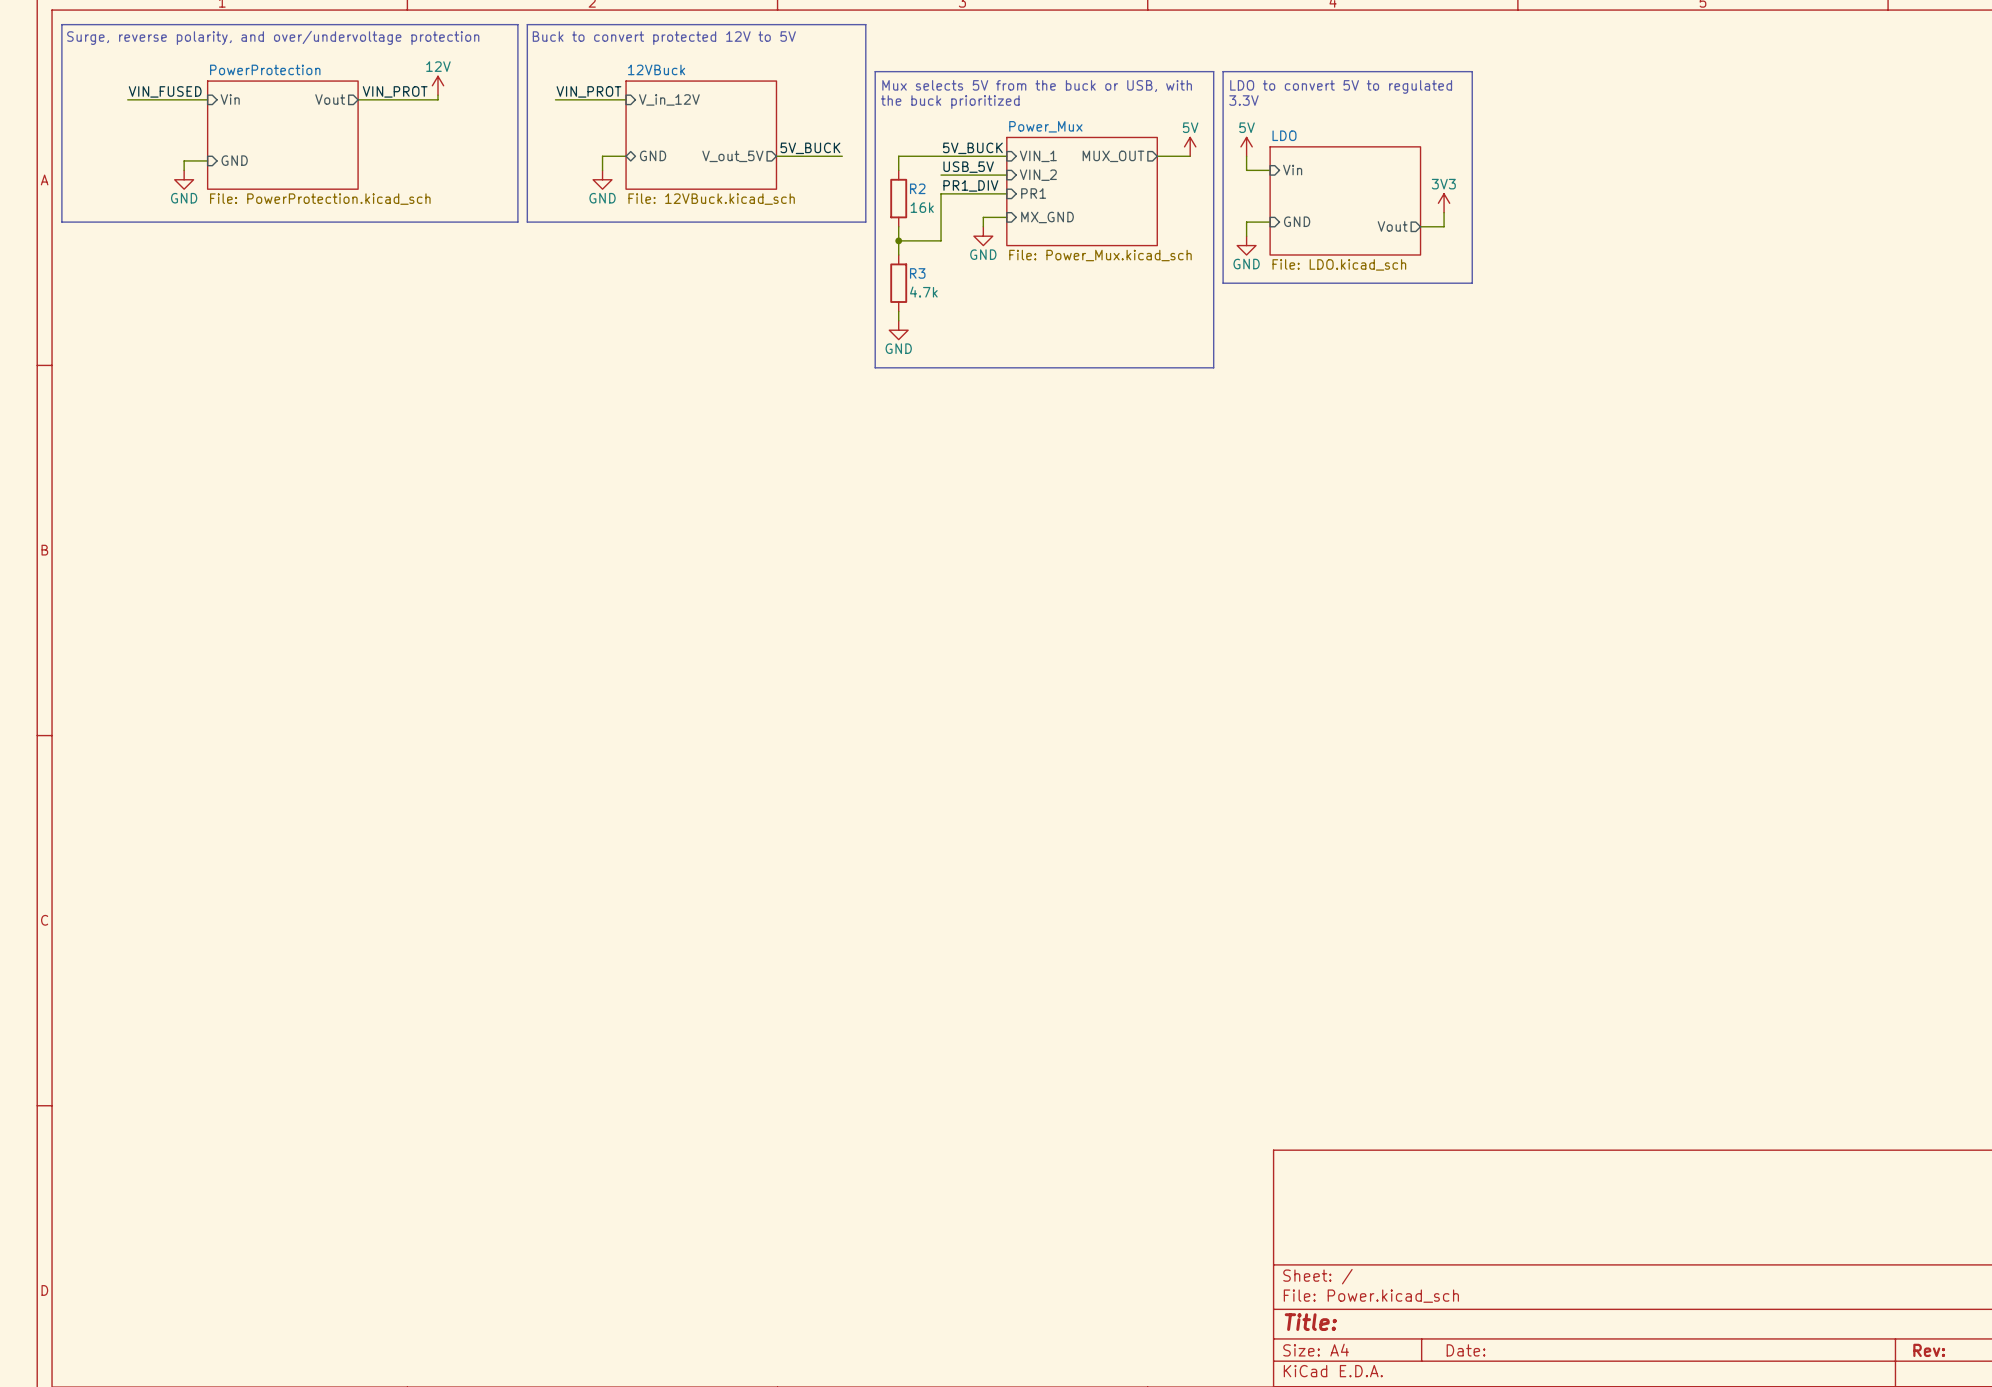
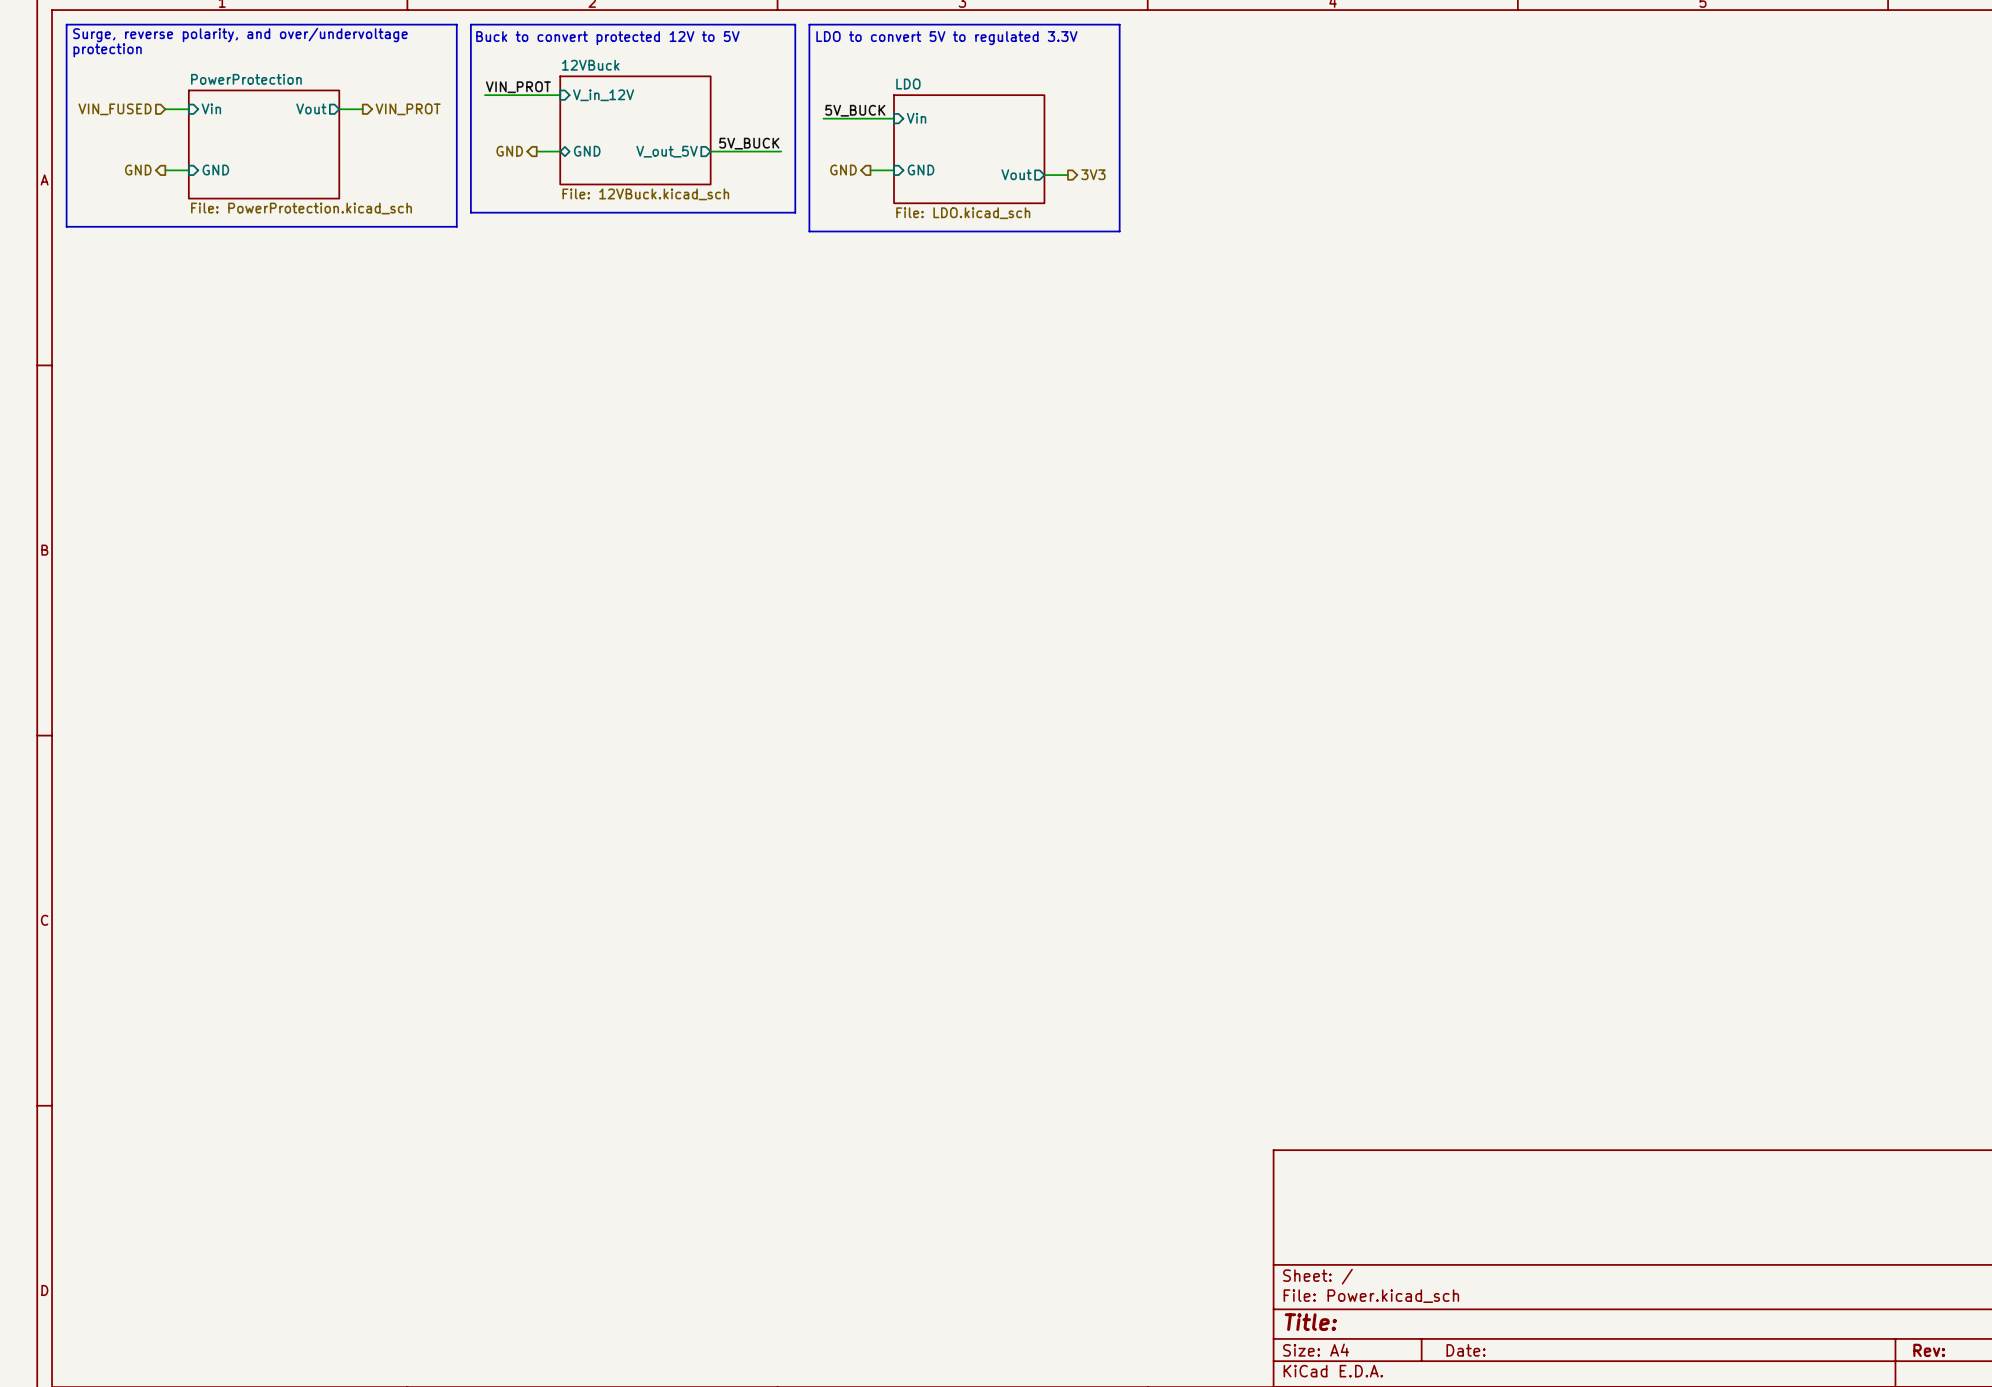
line: (66, 24) (61, 24) (61, 222) (517, 222) (517, 24) -> (66, 24) (66, 226) (456, 226) (456, 24)
line: (456, 24) (470, 24) -> (795, 24) (795, 212) (470, 212) (470, 24)
line: (527, 24) (527, 222) (865, 222) (865, 24) -> (527, 24) (517, 24)
line: (795, 24) (809, 24) -> (865, 24) (1119, 24) (1119, 231) (809, 231) (809, 24)
text: none -> Surge, reverse polarity, and over/undervoltage (240, 35)
text: Surge, reverse polarity, and over/undervoltage protection (273, 37) -> none
text position: Buck to convert protected 12V to 5V (664, 38) -> Buck to convert protected 12V to 5V (607, 38)
text: none -> LDO to convert 5V to regulated 3.3V (946, 38)
text: none -> protection (107, 50)
line: (875, 71) (1213, 71) (1213, 367) (875, 367) (875, 71) -> none
line: (1223, 71) (1472, 71) (1472, 283) (1223, 283) (1223, 71) -> none
power symbol: 12V (438, 85) -> none
text: Mux selects 5V from the buck or USB, with (1037, 86) -> none
text: LDO to convert 5V to regulated (1341, 86) -> none
label: VIN_FUSED (165, 91) -> none
label: VIN_PROT (395, 91) -> none
label position: VIN_PROT (588, 91) -> VIN_PROT (518, 87)
wire: (438, 95) (438, 99) (358, 99) -> none
wire: none -> (485, 95) (560, 95)
wire: (127, 99) (207, 99) -> none
sheet pin position: Vin (230, 99) -> Vin (211, 108)
sheet pin position: Vout (330, 99) -> Vout (311, 108)
wire: (555, 99) (626, 99) -> (710, 151) (781, 151)
sheet pin position: V_in_12V (669, 99) -> V_in_12V (603, 95)
text: 3.3V (1243, 100) -> none
text: the buck prioritized (950, 102) -> none
hierarchical label: none -> VIN_FUSED (115, 109)
wire: none -> (165, 109) (188, 109)
wire: none -> (339, 109) (362, 109)
hierarchical label: none -> VIN_PROT (408, 109)
label: none -> 5V_BUCK (855, 110)
wire: none -> (823, 118) (894, 118)
sheet pin: none -> Vin (916, 118)
sheet PowerProtection position: (282, 135) -> (264, 144)
sheet 12VBuck position: (701, 135) -> (635, 130)
power symbol: 5V (1190, 146) -> none
power symbol: 5V (1246, 146) -> none
label position: 5V_BUCK (810, 148) -> 5V_BUCK (749, 143)
label: 5V_BUCK (972, 148) -> none
sheet LDO: none -> File: LDO.kicad_sch (969, 149)
hierarchical label: none -> GND (509, 151)
wire: none -> (536, 151) (560, 151)
sheet pin position: GND (653, 155) -> GND (587, 151)
wire: (626, 156) (602, 156) (602, 170) -> none
sheet pin position: V_out_5V (732, 156) -> V_out_5V (667, 151)
wire: (776, 156) (842, 156) -> none
wire: (1006, 156) (898, 156) (898, 170) -> none
sheet pin: VIN_1 (1038, 156) -> none
sheet pin: MUX_OUT (1113, 156) -> none
wire: (1157, 156) (1190, 156) -> none
wire: (1246, 156) (1246, 170) (1270, 170) -> none
wire: (207, 160) (184, 160) (184, 170) -> none
sheet pin position: GND (234, 160) -> GND (215, 170)
label: USB_5V (968, 167) -> none
hierarchical label: none -> GND (138, 170)
wire: none -> (165, 170) (188, 170)
hierarchical label: none -> GND (843, 170)
wire: none -> (870, 170) (894, 170)
sheet pin: none -> GND (921, 170)
sheet pin: Vin (1292, 170) -> none
sheet pin: none -> Vout (1016, 174)
hierarchical label: none -> 3V3 (1093, 174)
wire: (941, 175) (1006, 175) -> none
sheet pin: VIN_2 (1038, 175) -> none
wire: none -> (1044, 175) (1067, 175)
power symbol: GND (184, 179) -> none
power symbol: GND (602, 179) -> none
label: PR1_DIV (970, 185) -> none
sheet Power_Mux: File: Power_Mux.kicad_sch (1082, 191) -> none
wire: (1006, 193) (941, 193) (941, 240) (898, 240) -> none
sheet pin: PR1 (1033, 193) -> none
R2: 16k (898, 198) -> none
sheet LDO: File: LDO.kicad_sch (1345, 200) -> none
power symbol: 3V3 (1444, 203) -> none
wire: (1444, 212) (1444, 226) (1420, 226) -> none
wire: (1006, 217) (983, 217) (983, 226) -> none
sheet pin: MX_GND (1047, 217) -> none
sheet pin: GND (1297, 221) -> none
wire: (1270, 222) (1246, 222) (1246, 236) -> none
wire: (898, 226) (898, 254) -> none
sheet pin: Vout (1392, 226) -> none
power symbol: GND (983, 236) -> none
junction: (898, 240) -> none
power symbol: GND (1246, 245) -> none
R3: 4.7k (898, 283) -> none
wire: (898, 311) (898, 320) -> none
power symbol: GND (898, 330) -> none

